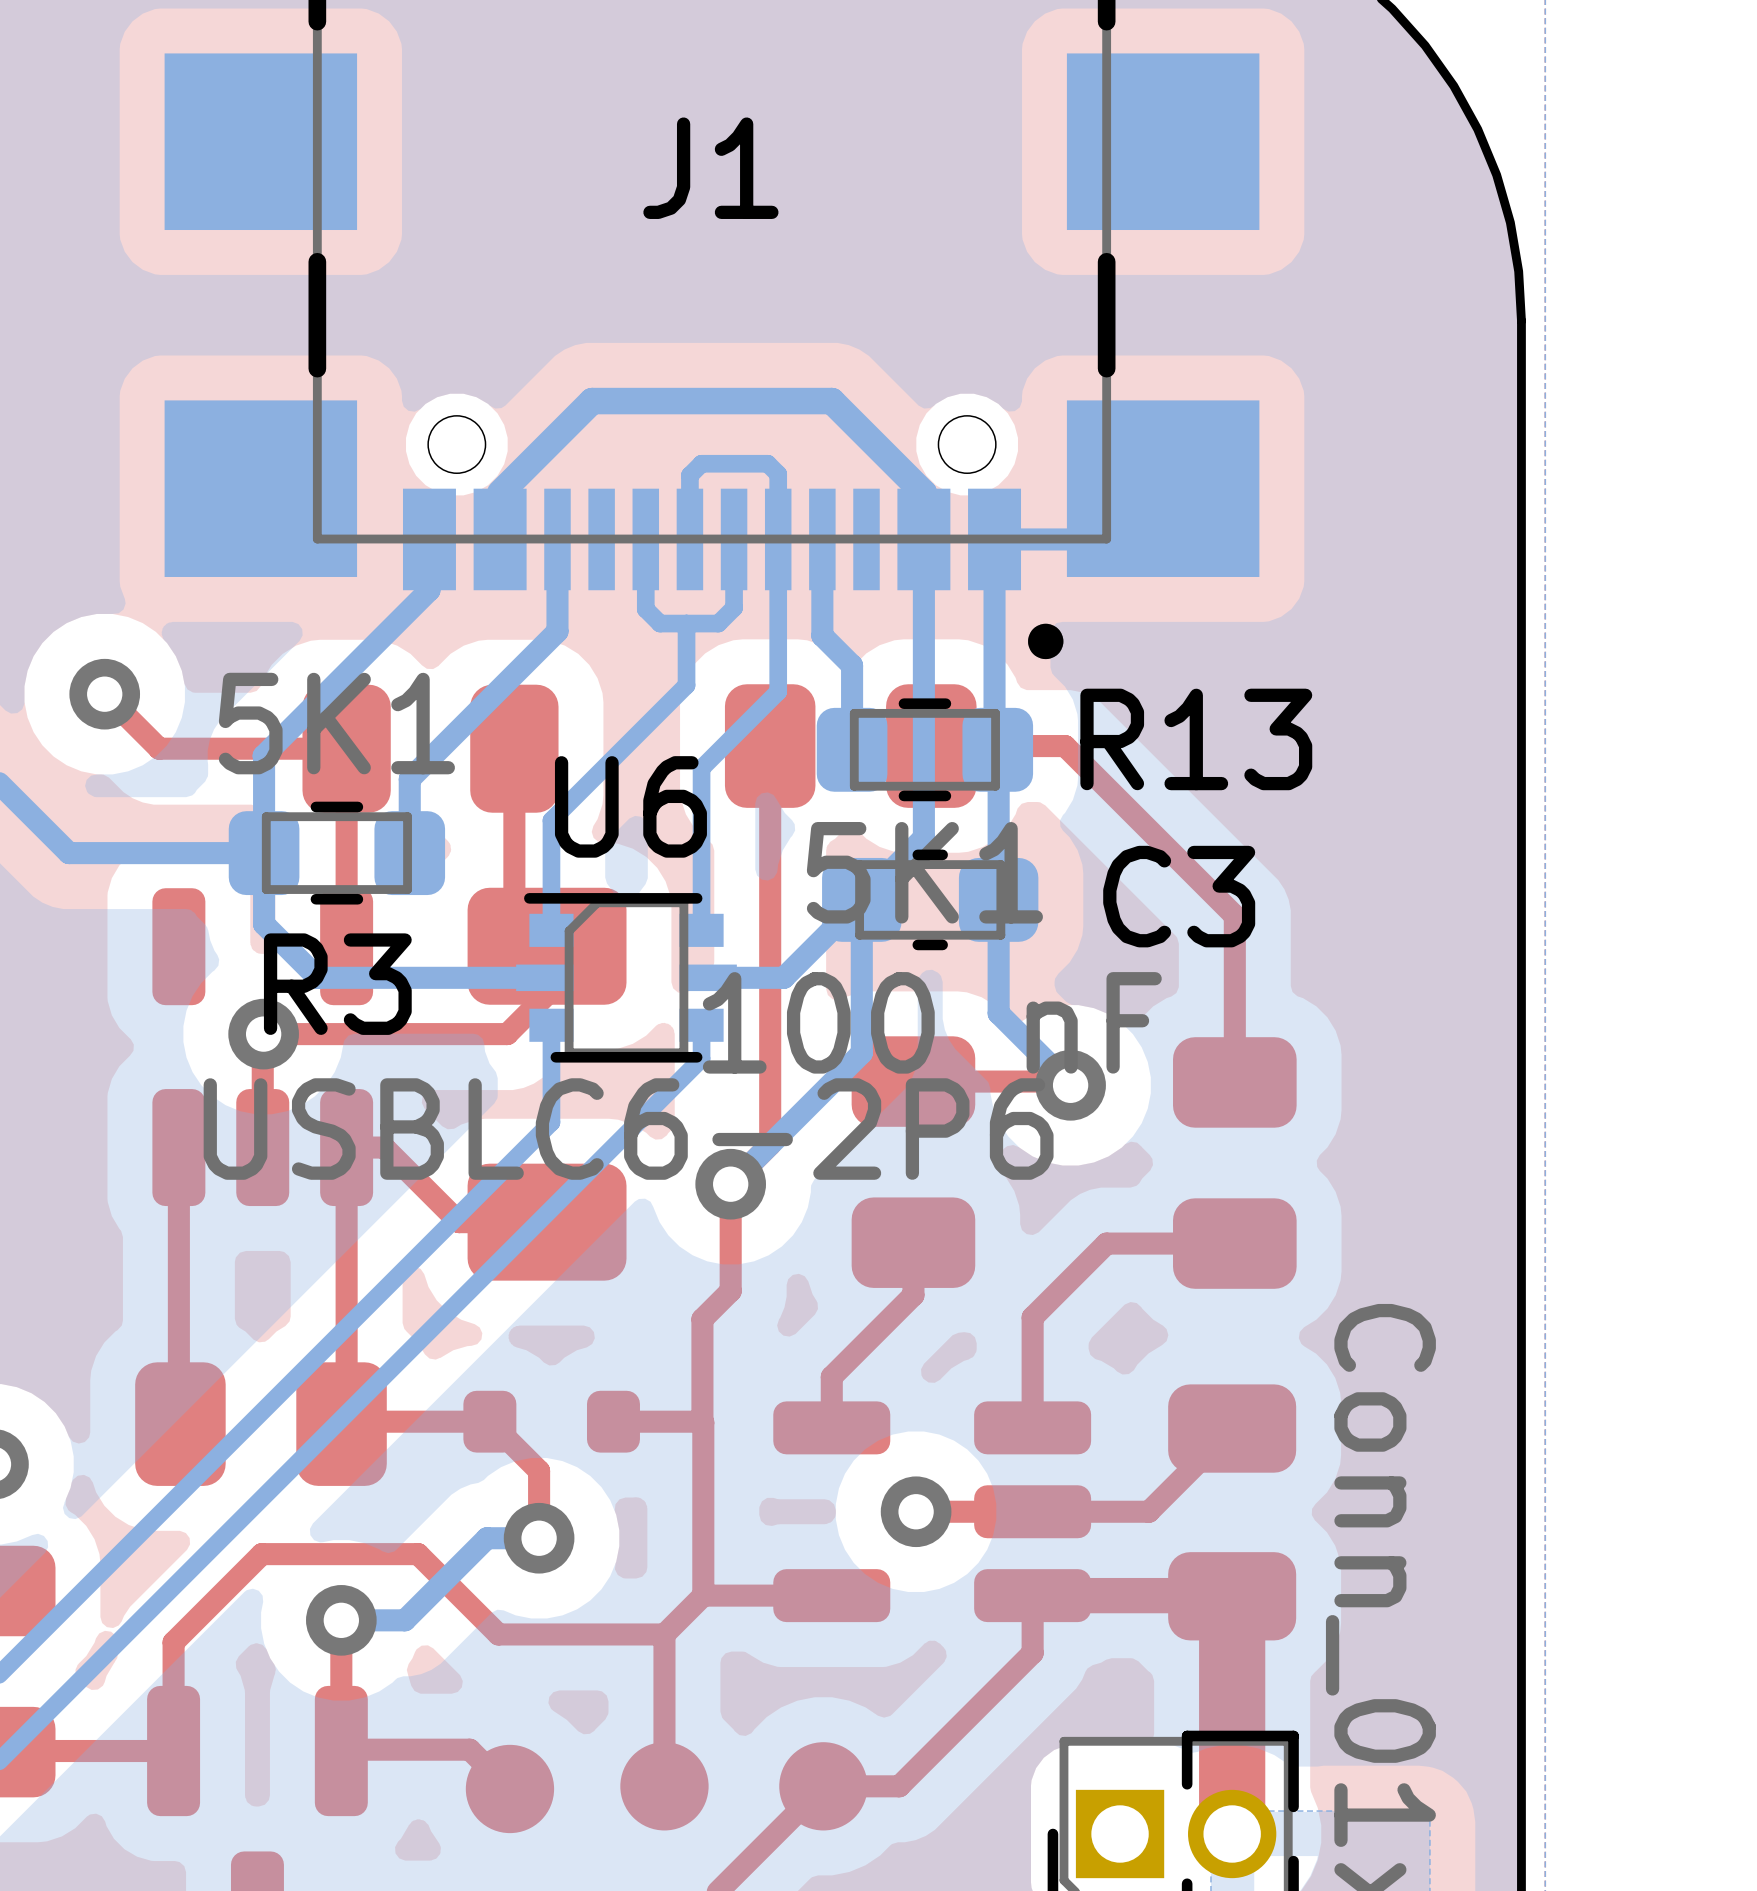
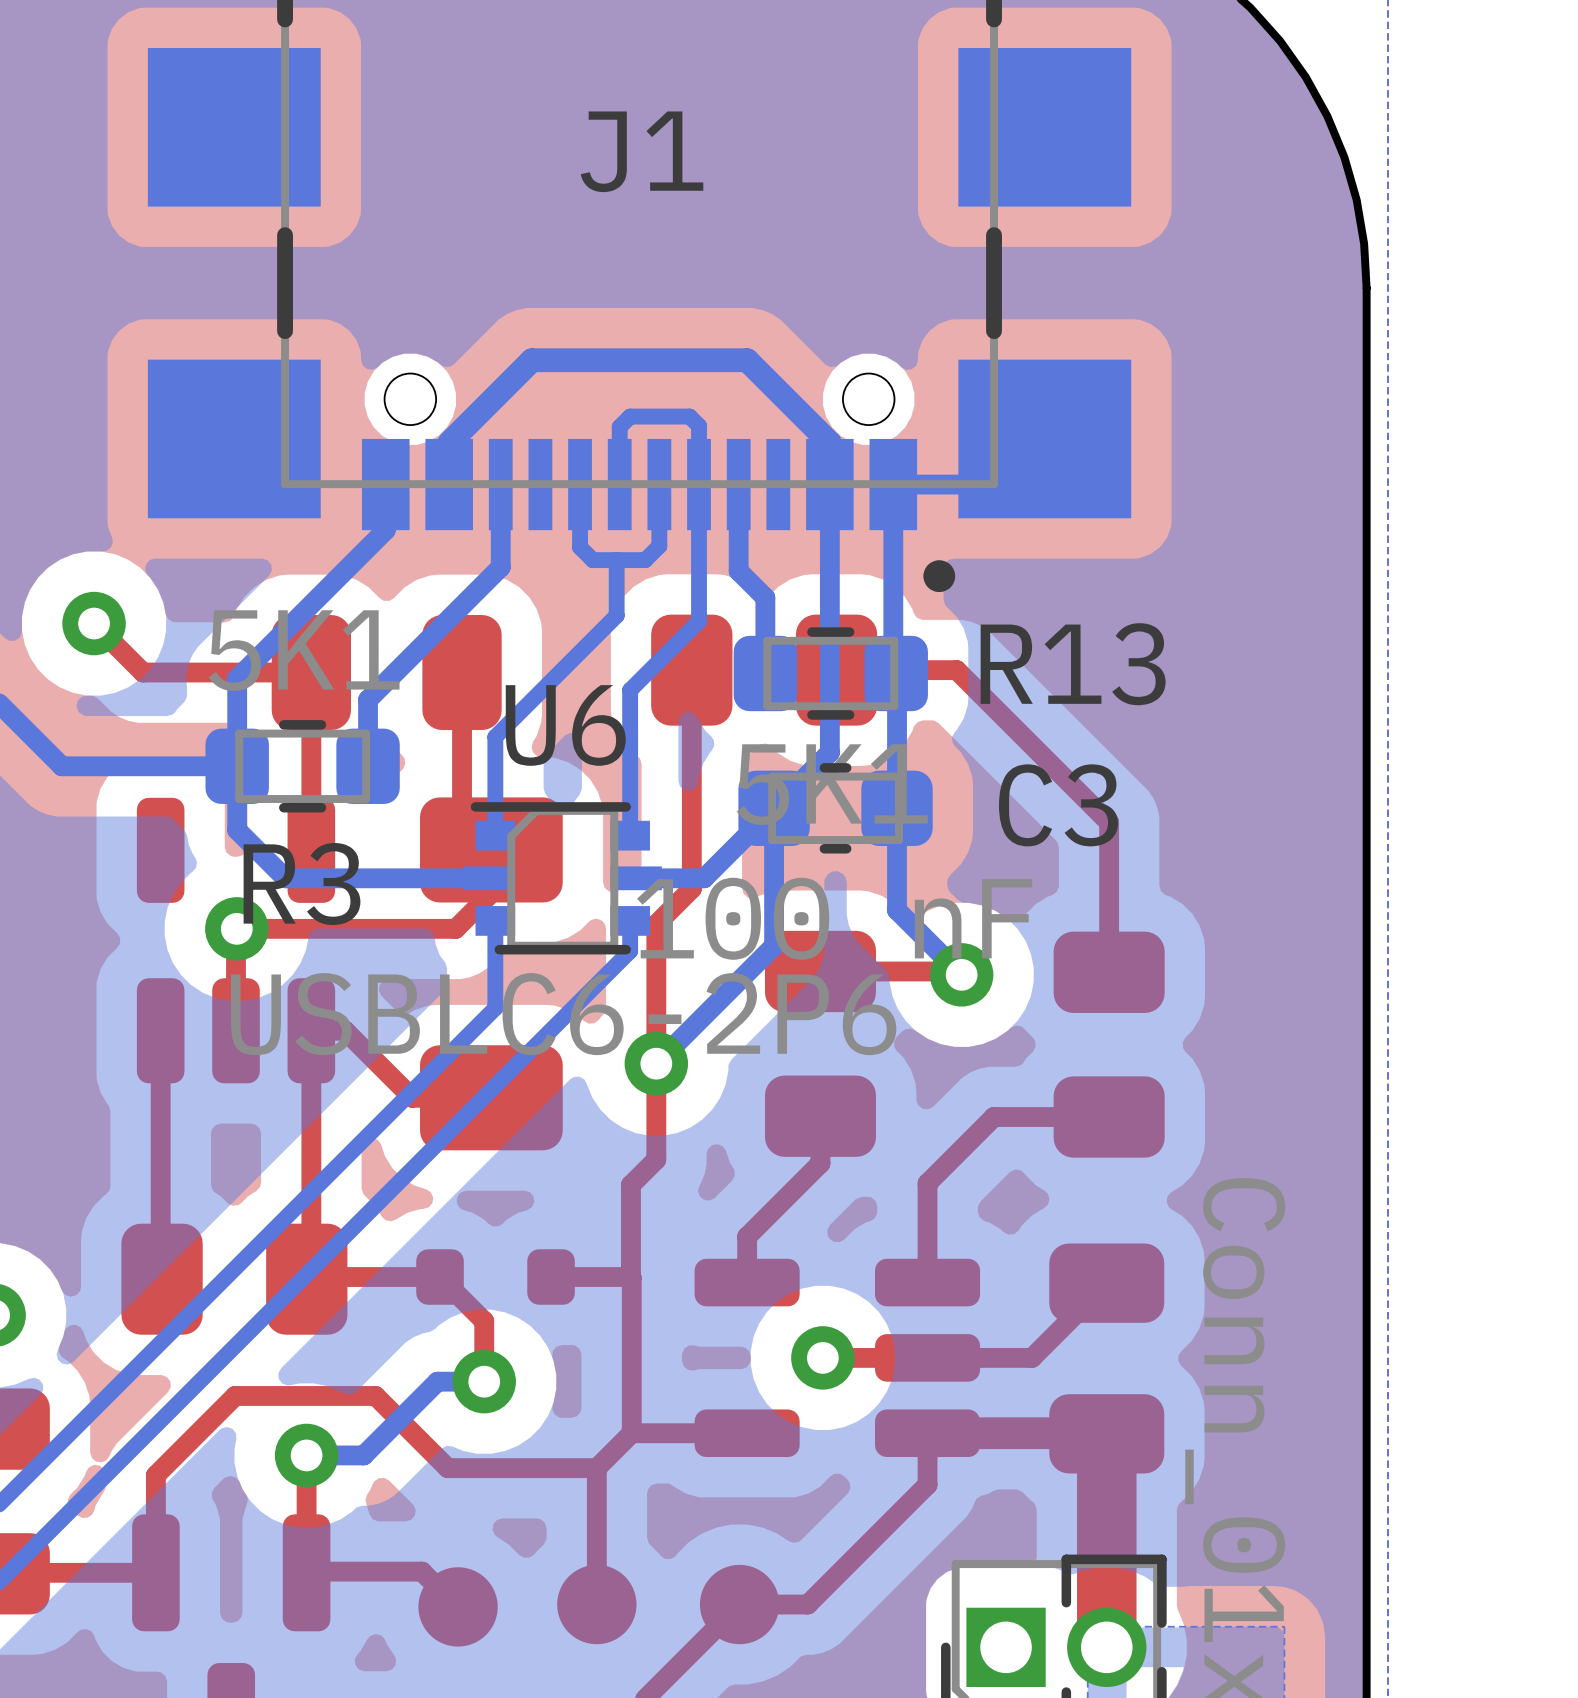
top track: (770, 989) (770, 1144) (730, 1184) -> (691, 888) (656, 924) (656, 1063)

